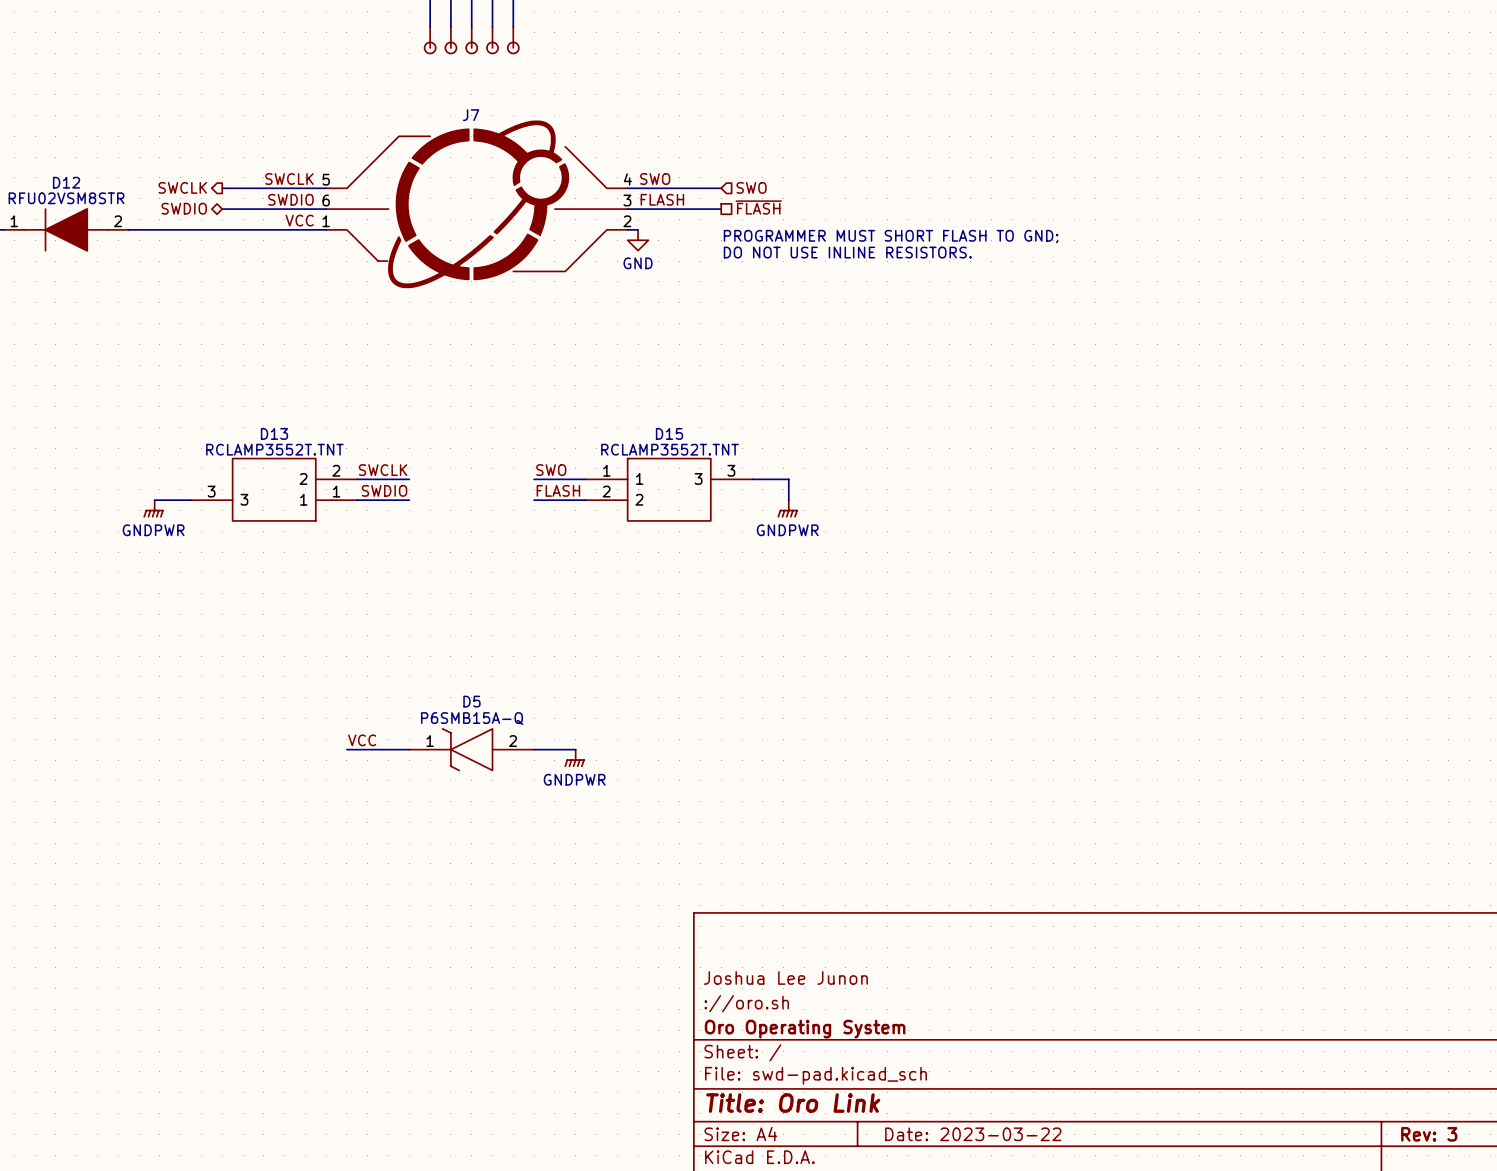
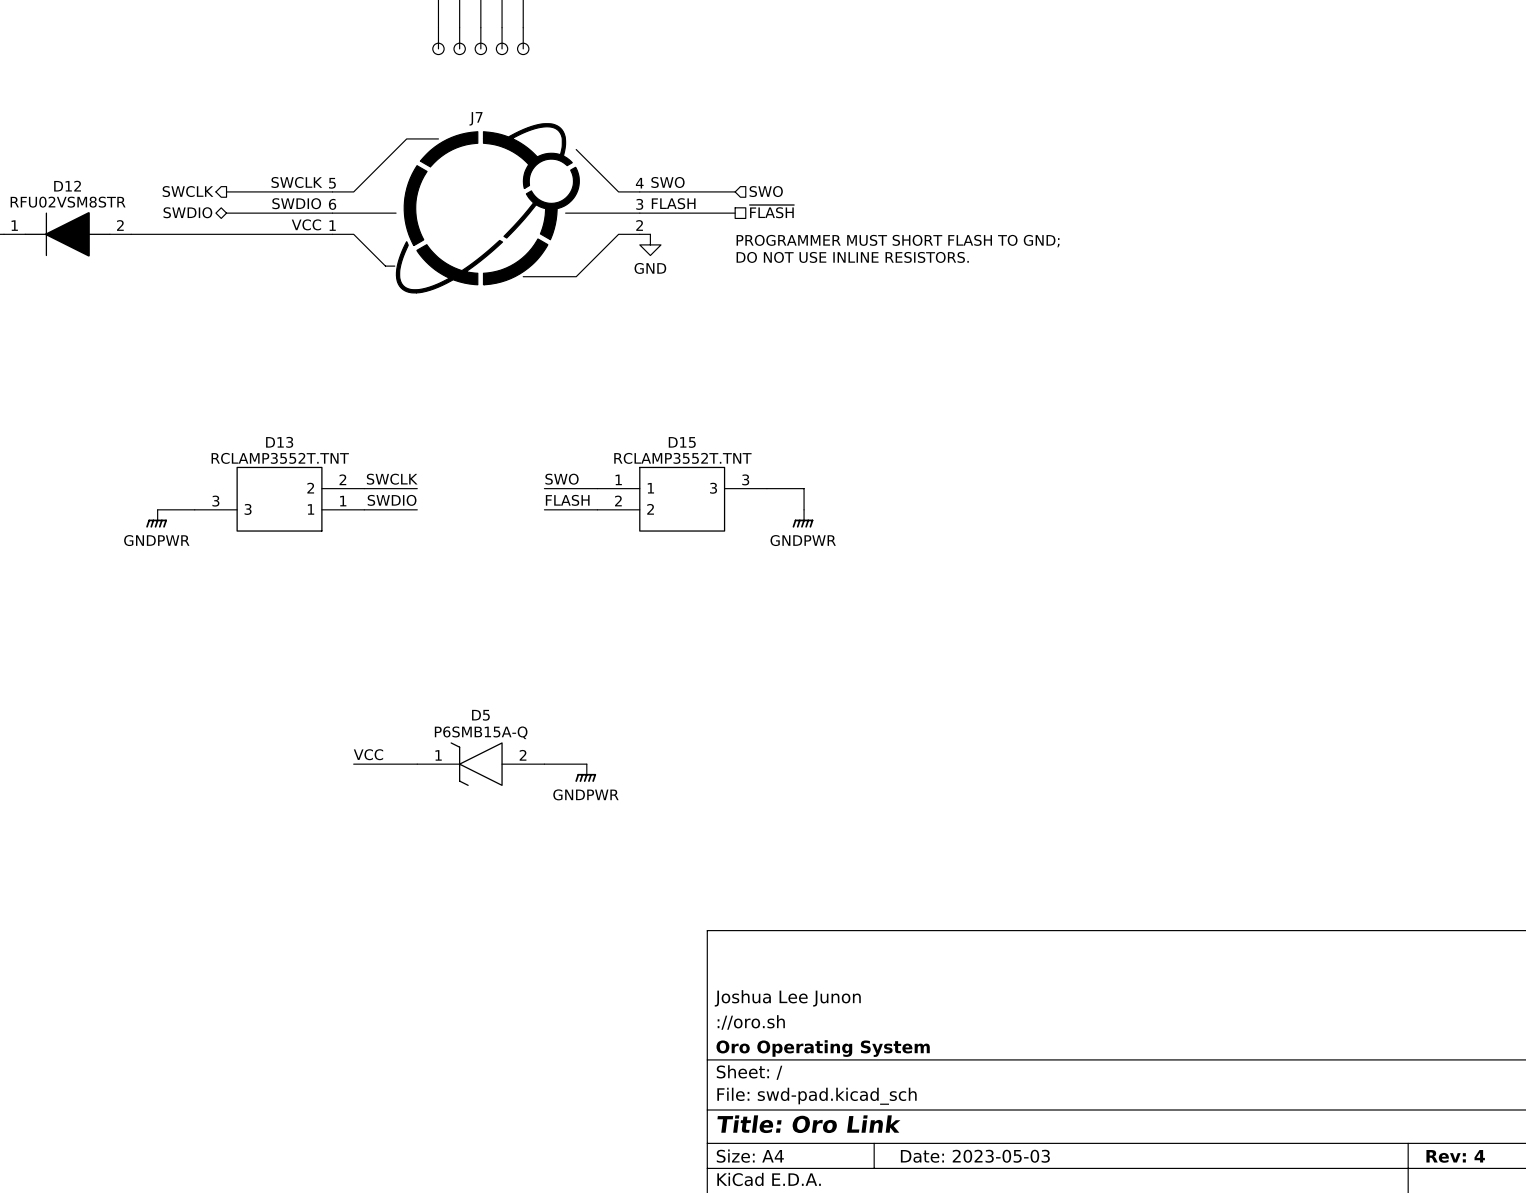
title block: Date: 2023-03-22 (973, 1134) -> Date: 2023-05-03 (975, 1156)
title block: Rev: 3 (1429, 1134) -> Rev: 4 (1455, 1156)

